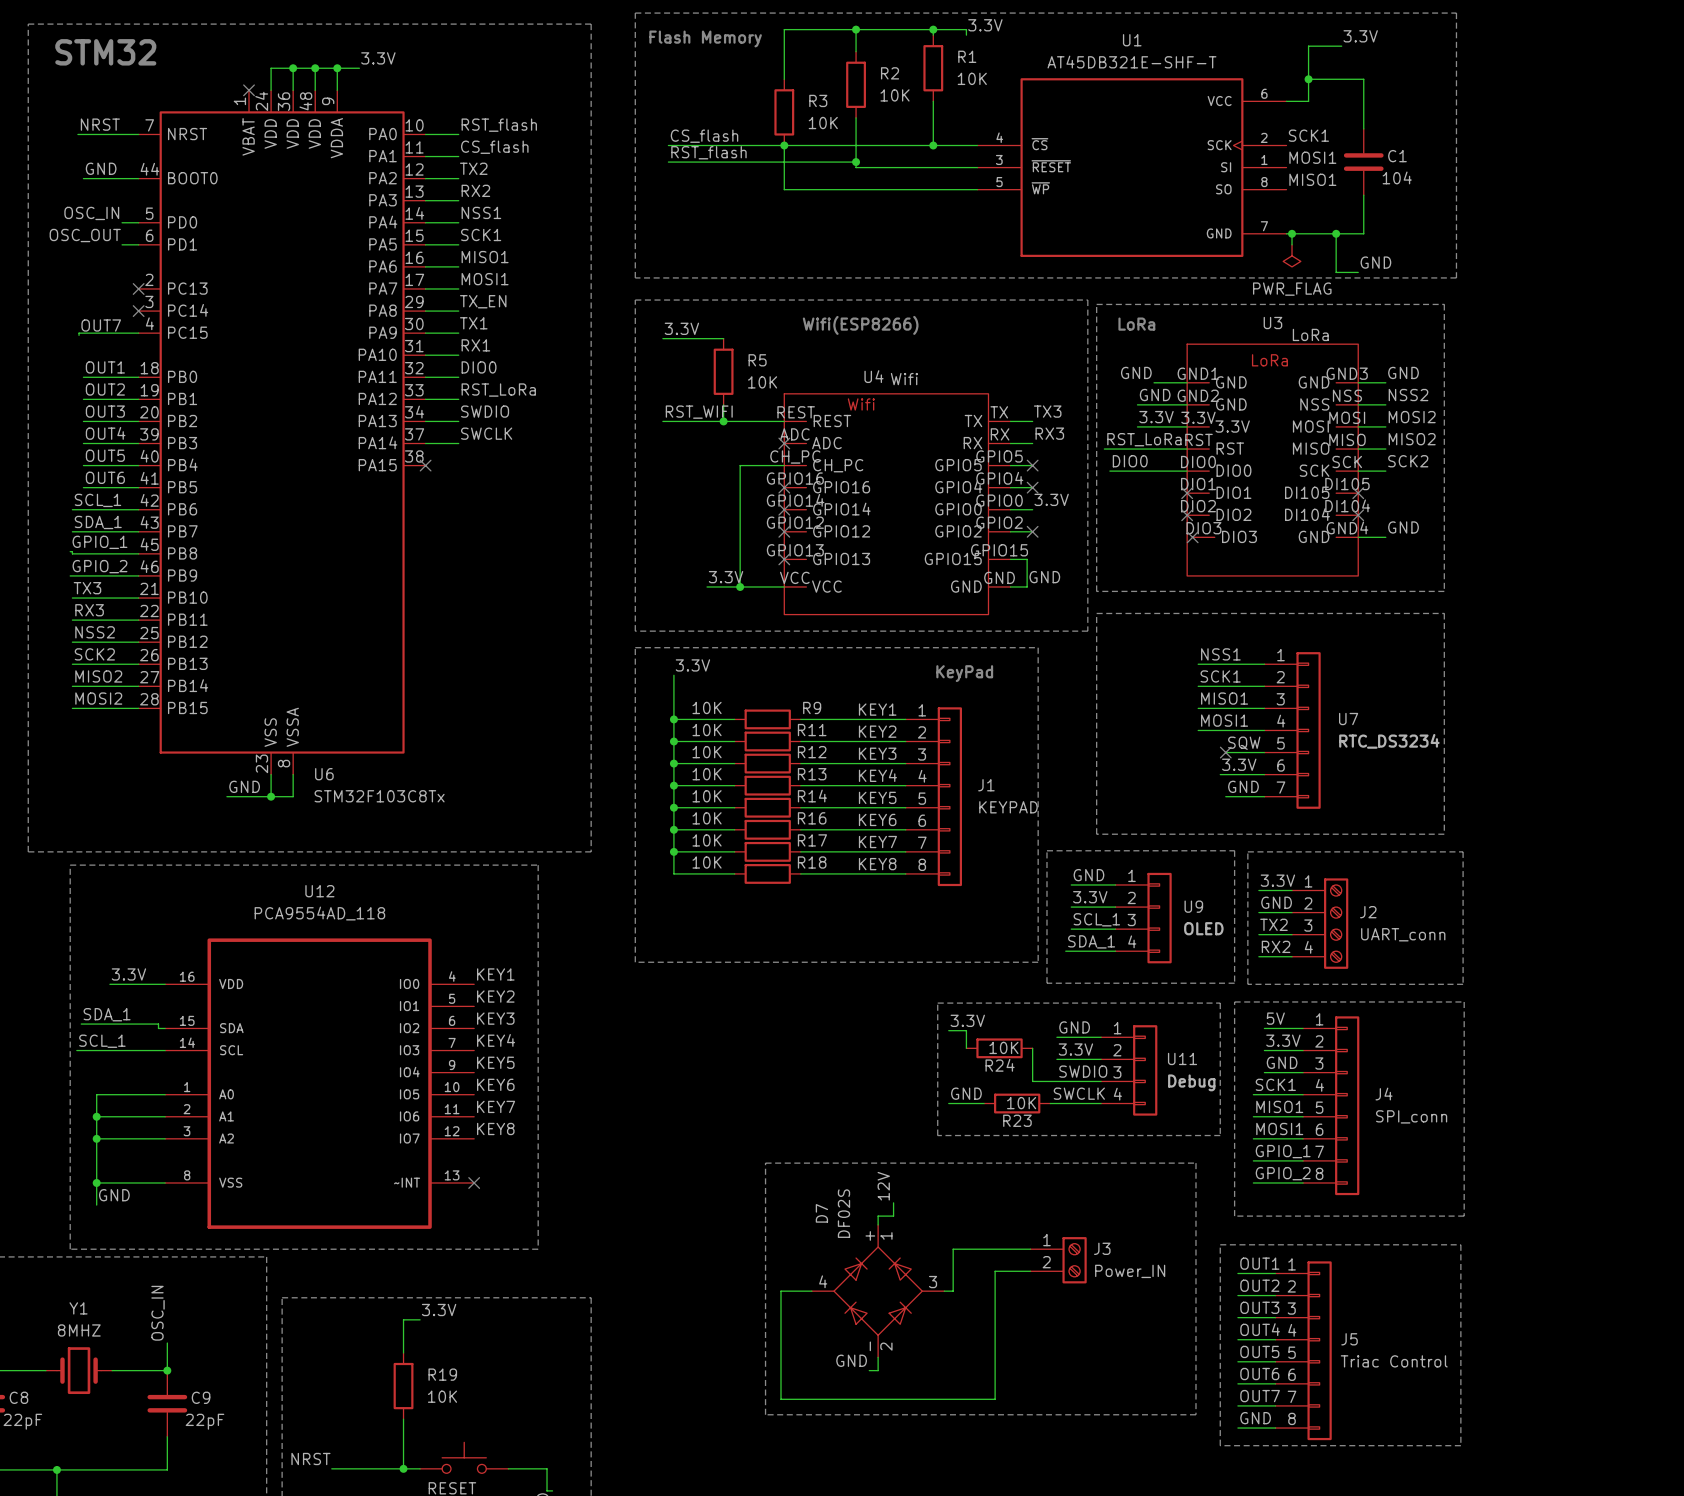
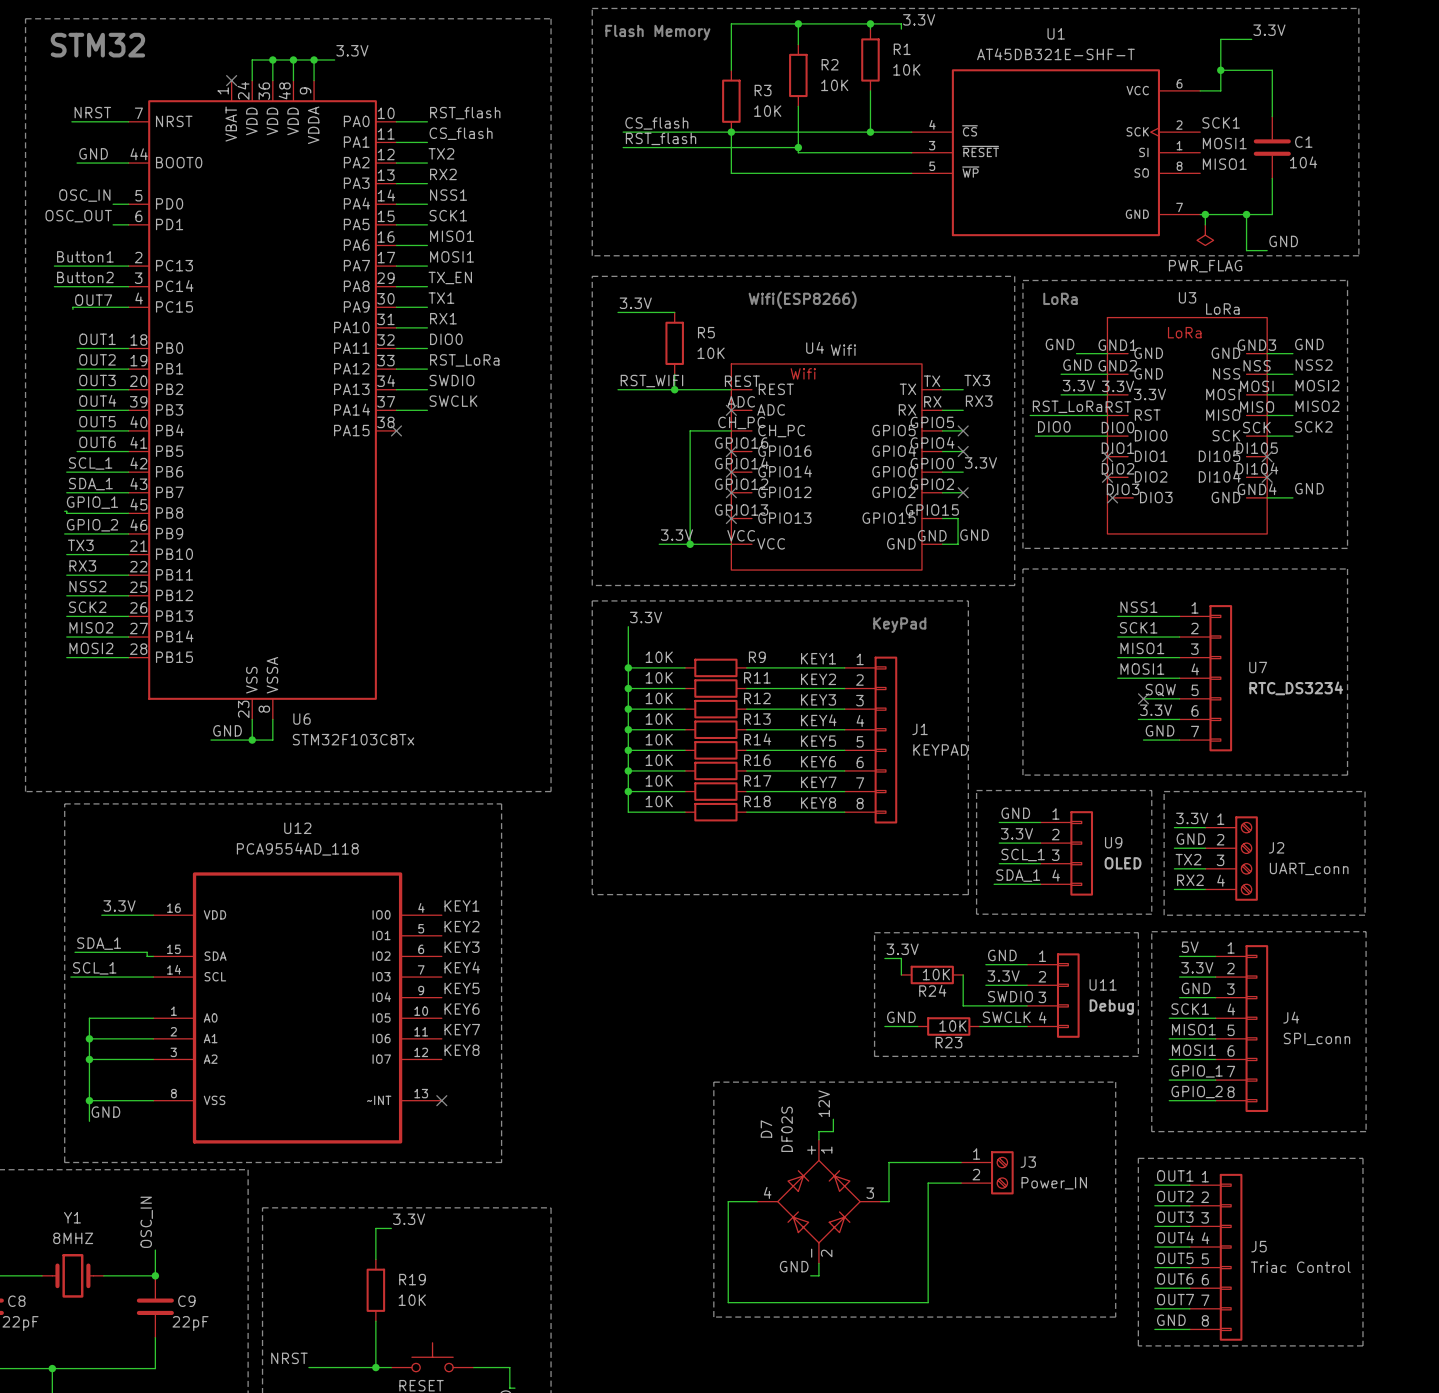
label: none -> Button1 (85, 256)
wire: none -> (54, 266) (128, 266)
no-connect mark: (138, 288) -> none
label: none -> Button2 (85, 277)
wire: none -> (54, 286) (128, 286)
no-connect mark: (138, 311) -> none

